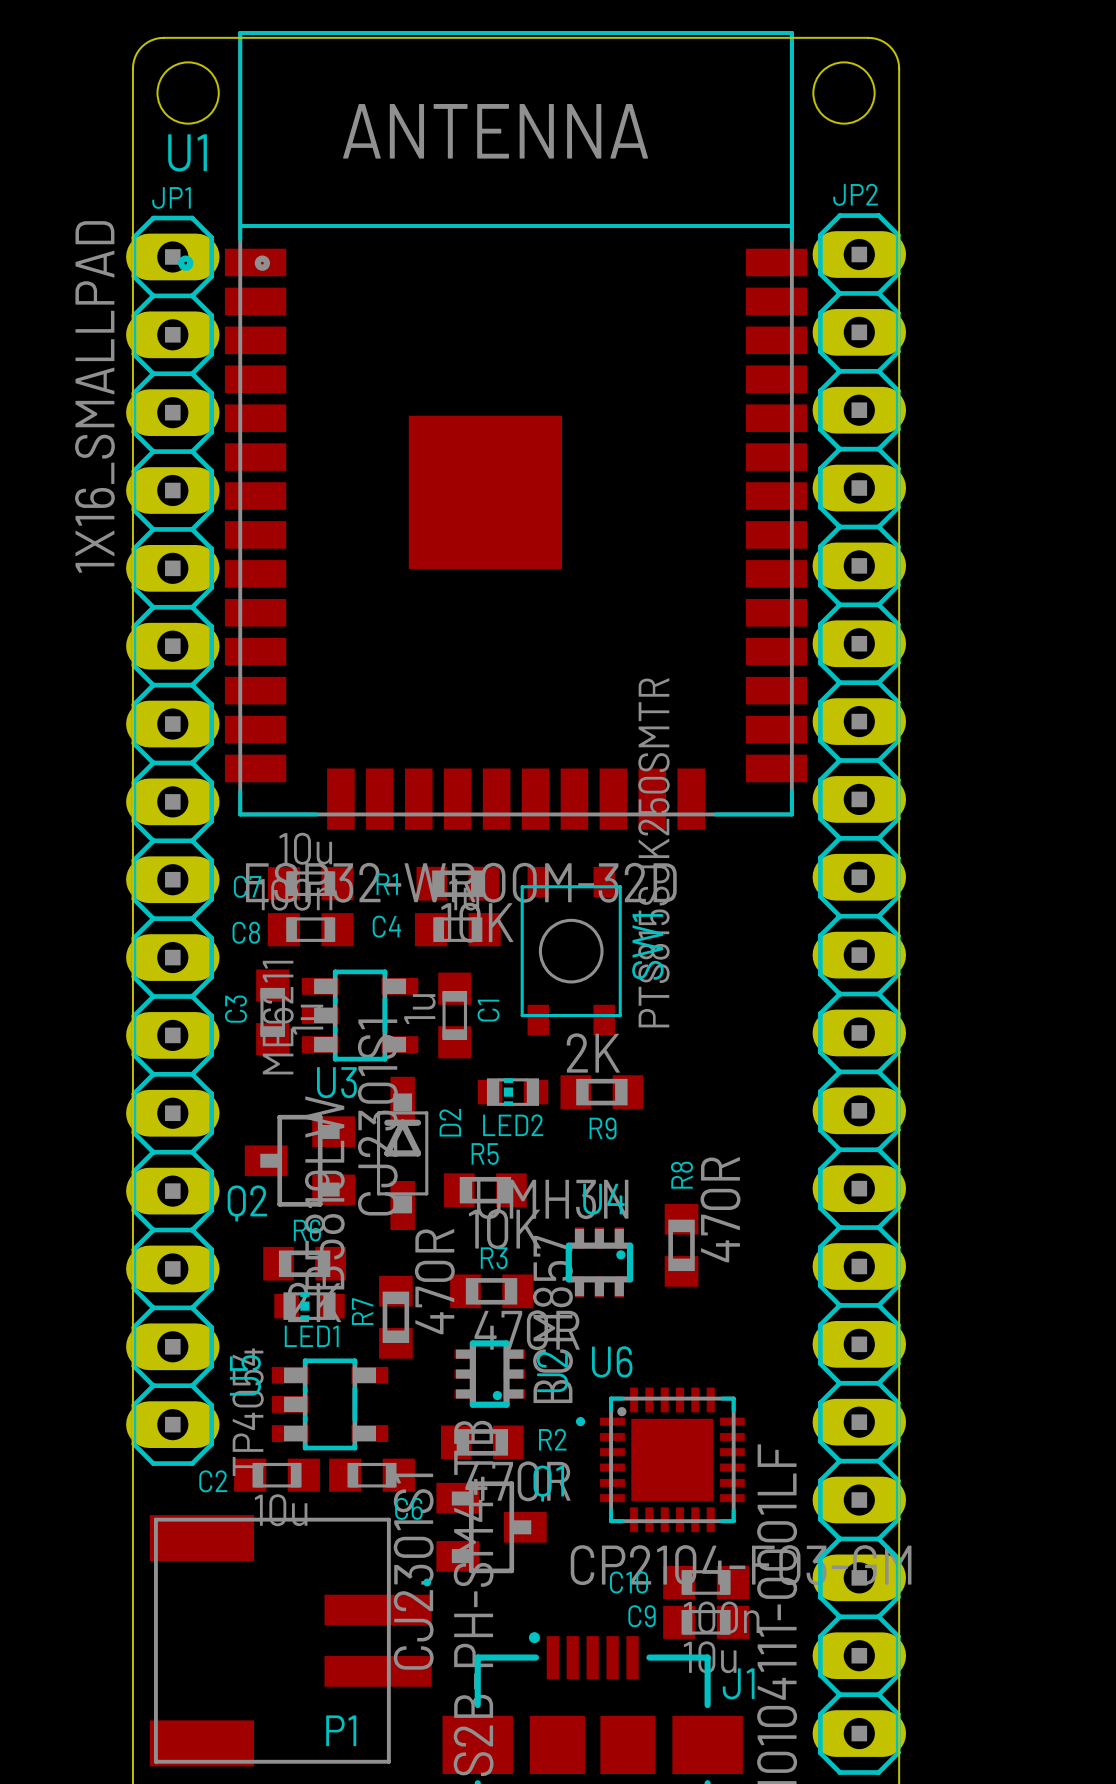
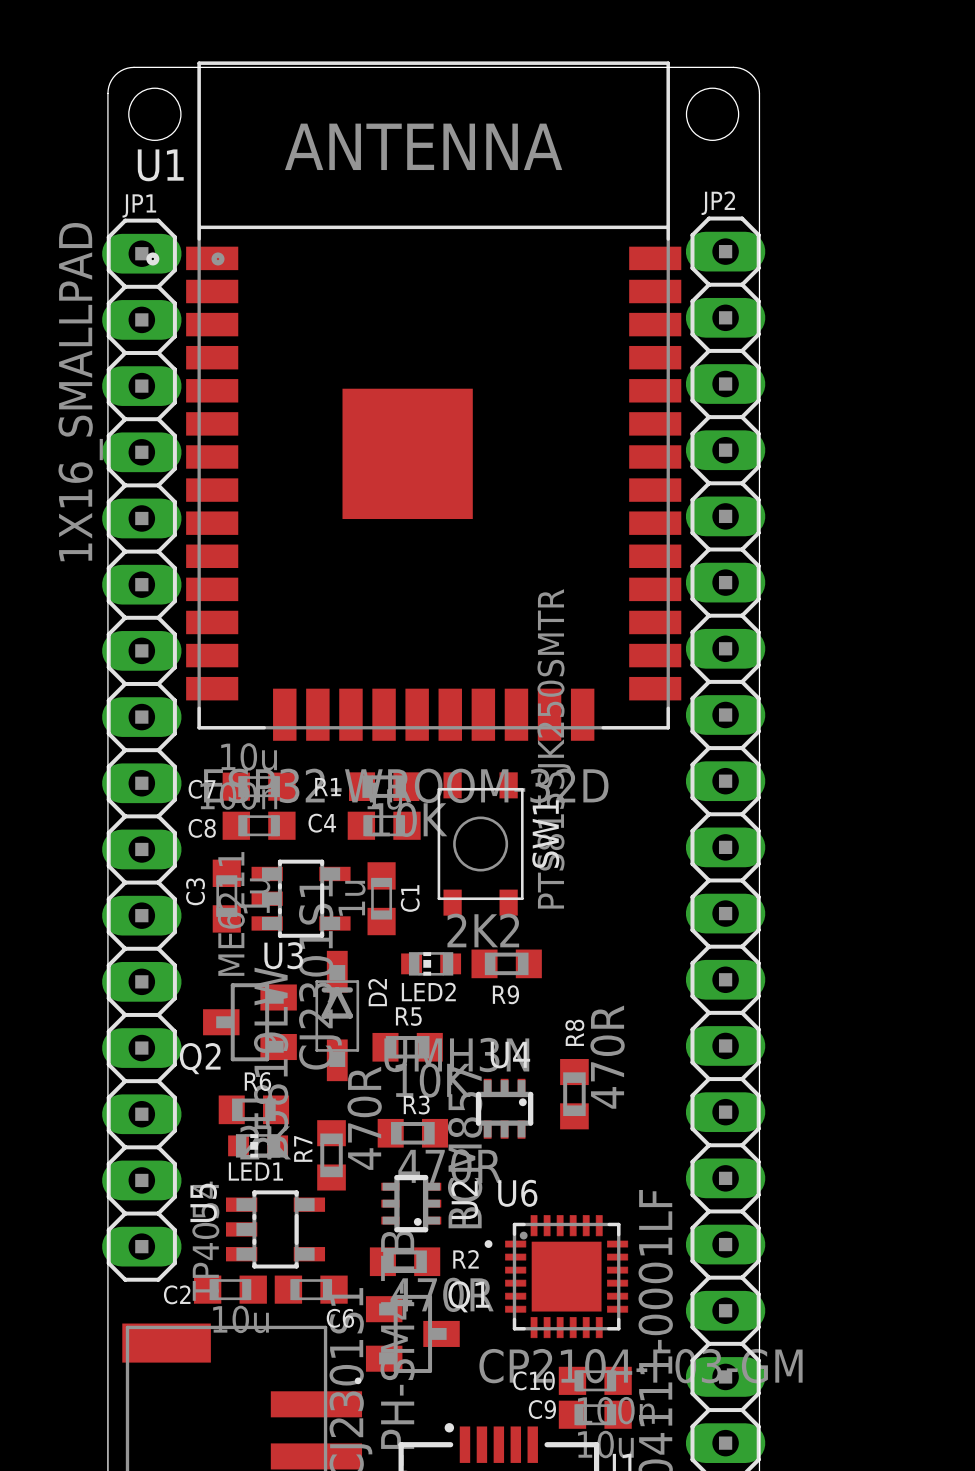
R9 value: 2K (593, 1052) -> 2K2 (483, 930)

